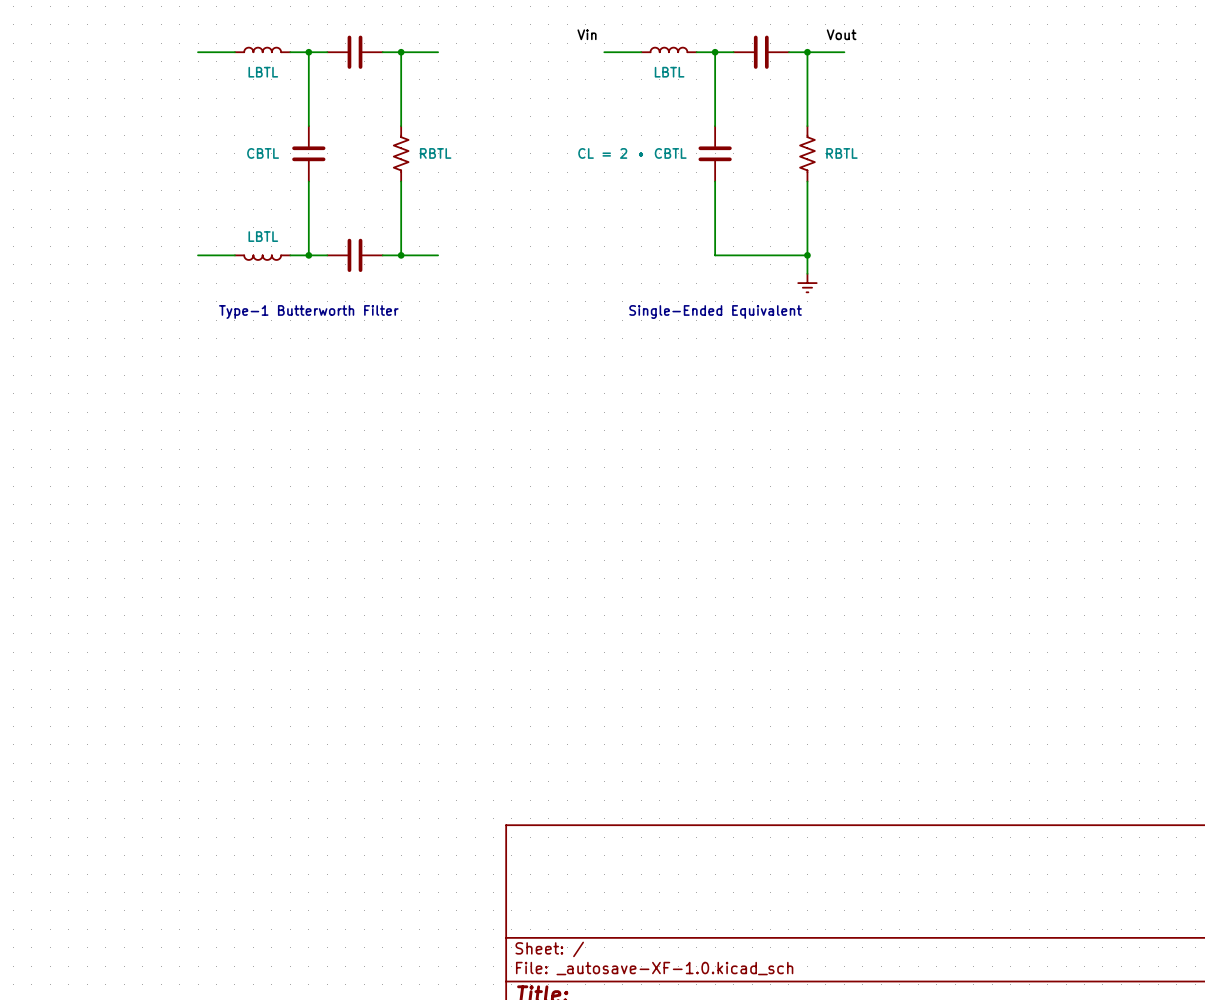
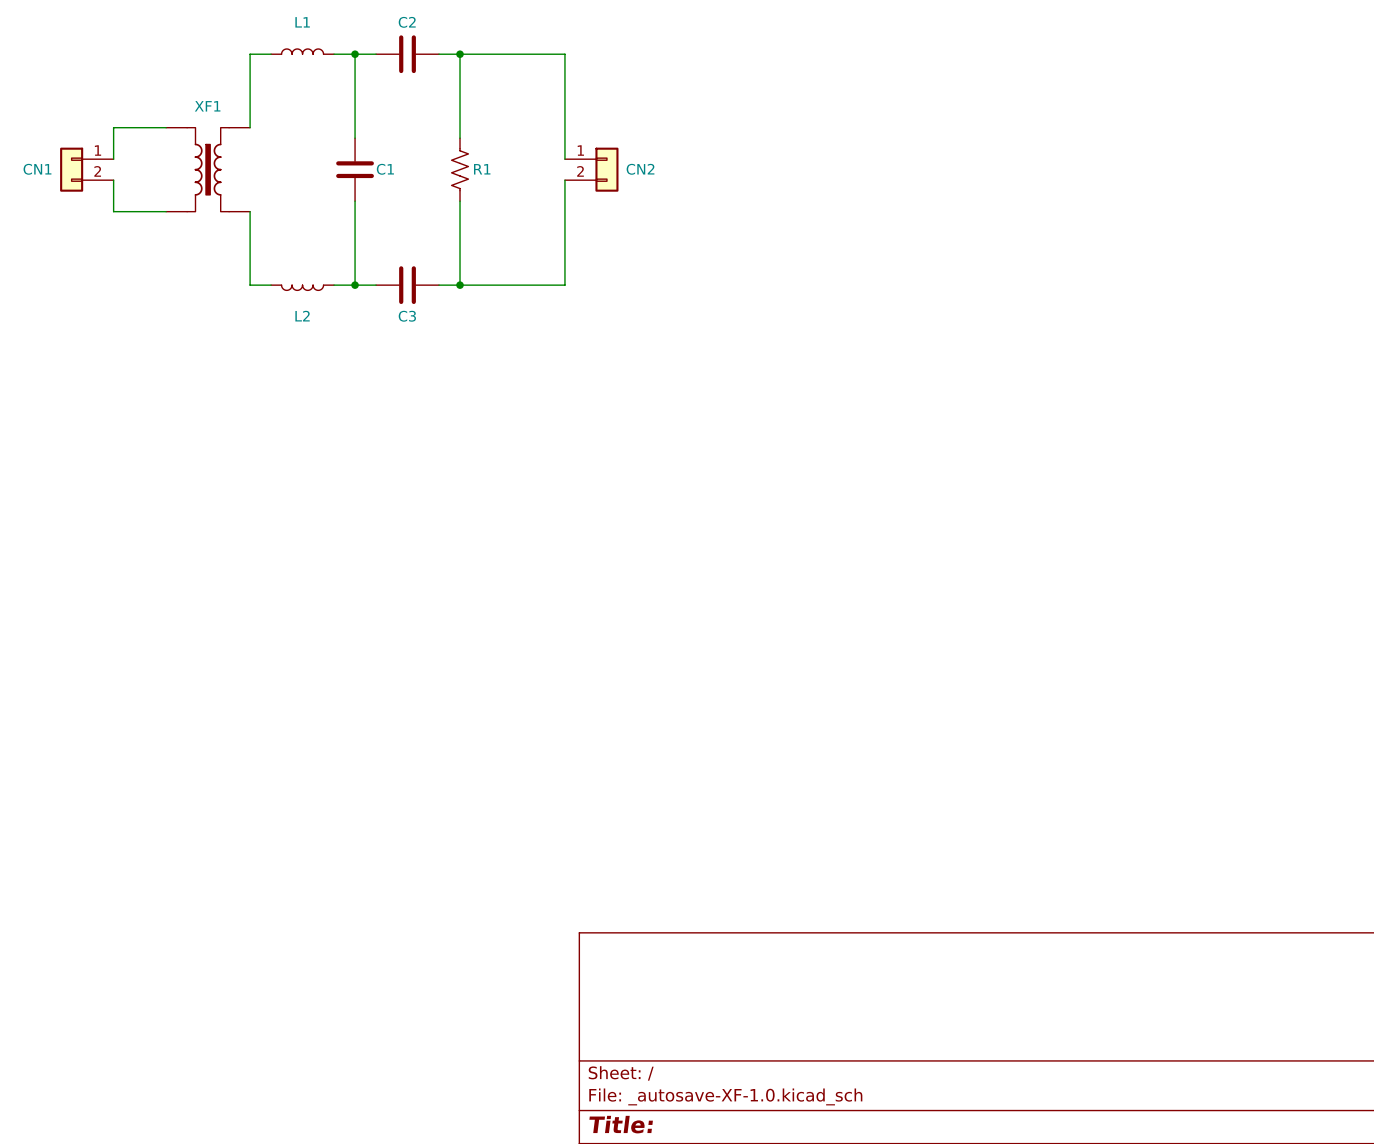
L1 name: none -> L1 (302, 22)
C2 name: none -> C2 (407, 22)
label: Vin (587, 34) -> none
label: Vout (841, 34) -> none
part: LBTL (668, 49) -> none
wire: (198, 52) (216, 52) -> (250, 127) (250, 54)
wire: none -> (501, 54) (564, 54) (564, 159)
wire: (604, 52) (641, 52) -> none
wire: (696, 52) (733, 52) -> none
wire: (715, 52) (715, 126) -> none
junction: (715, 52) -> none
part: (761, 52) -> none
wire: (788, 52) (844, 52) -> none
wire: (807, 52) (807, 126) -> none
junction: (807, 52) -> none
L1 value: LBTL (263, 72) -> none
wire: none -> (166, 127) (113, 127) (113, 159)
CN1: none -> (86, 169)
XF1: none -> (208, 169)
C1 value: CBTL (263, 153) -> none
C1 name: none -> C1 (385, 169)
R1 name: none -> R1 (482, 169)
R1 value: RBTL (435, 153) -> none
CN2: none -> (591, 169)
part: CL = 2 • CBTL (715, 153) -> none
part: RBTL (807, 153) -> none
wire: none -> (113, 180) (113, 211) (166, 211)
wire: none -> (564, 180) (564, 285) (501, 285)
wire: (715, 181) (715, 255) (807, 255) -> none
wire: (807, 181) (807, 273) -> none
L2 value: LBTL (263, 236) -> none
wire: (198, 255) (216, 255) -> (250, 211) (250, 285)
junction: (807, 255) -> none
L2 name: none -> L2 (302, 316)
C3 name: none -> C3 (407, 316)
power symbol: (807, 283) -> none
text: Type-1 Butterworth Filter (308, 312) -> none
text: Single-Ended Equivalent (715, 312) -> none

